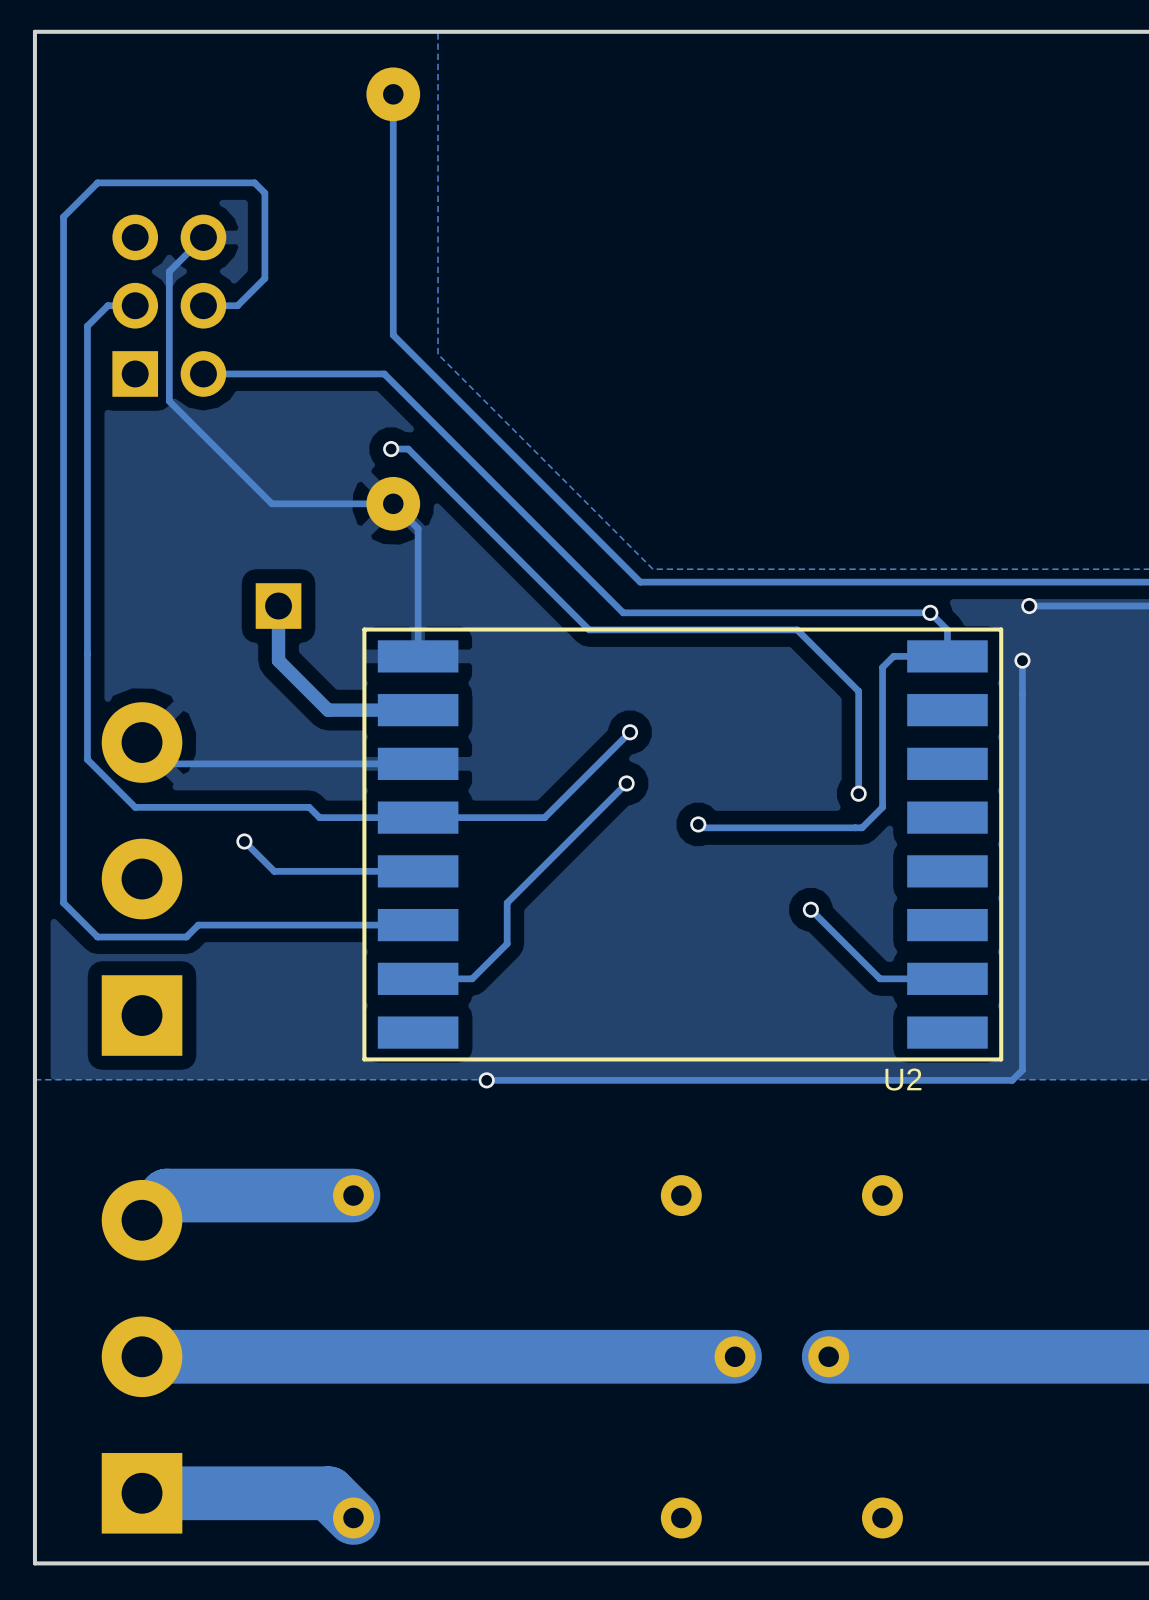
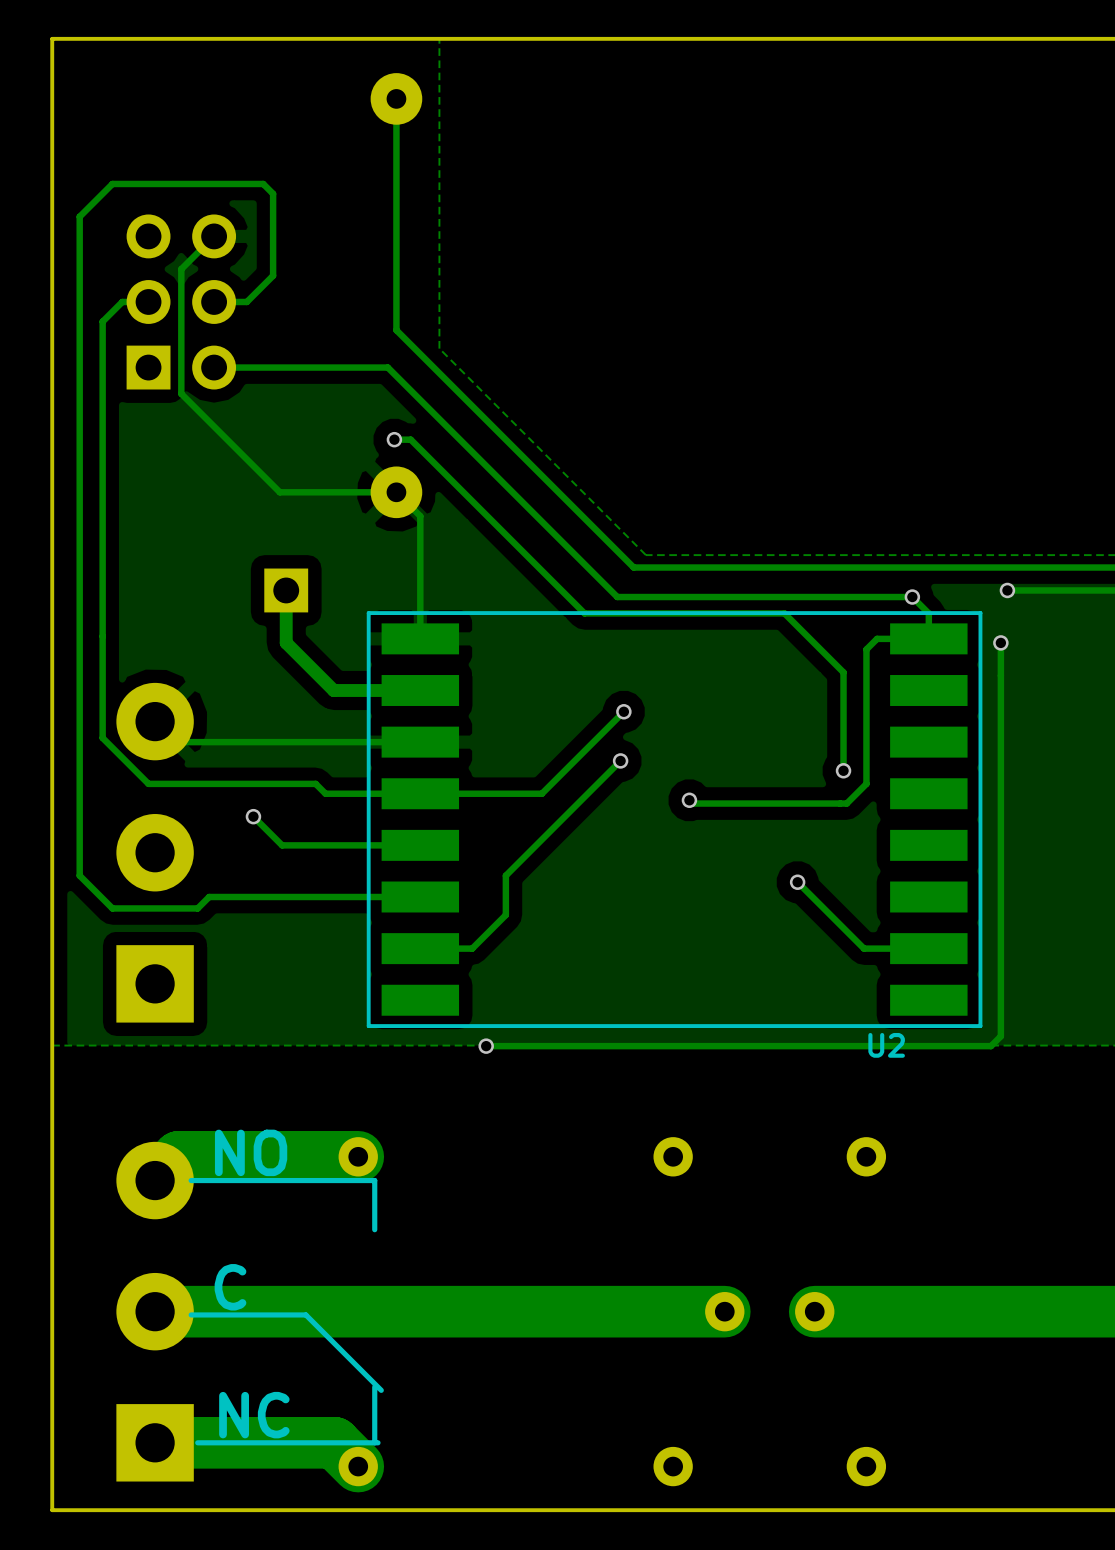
text: none -> NO (251, 1152)
line: none -> (191, 1180) (374, 1180) (374, 1229)
text: none -> C (230, 1287)
line: none -> (191, 1314) (305, 1314) (381, 1390)
line: none -> (374, 1387) (374, 1442)
text: none -> NC (254, 1415)
line: none -> (378, 1442) (197, 1442)

